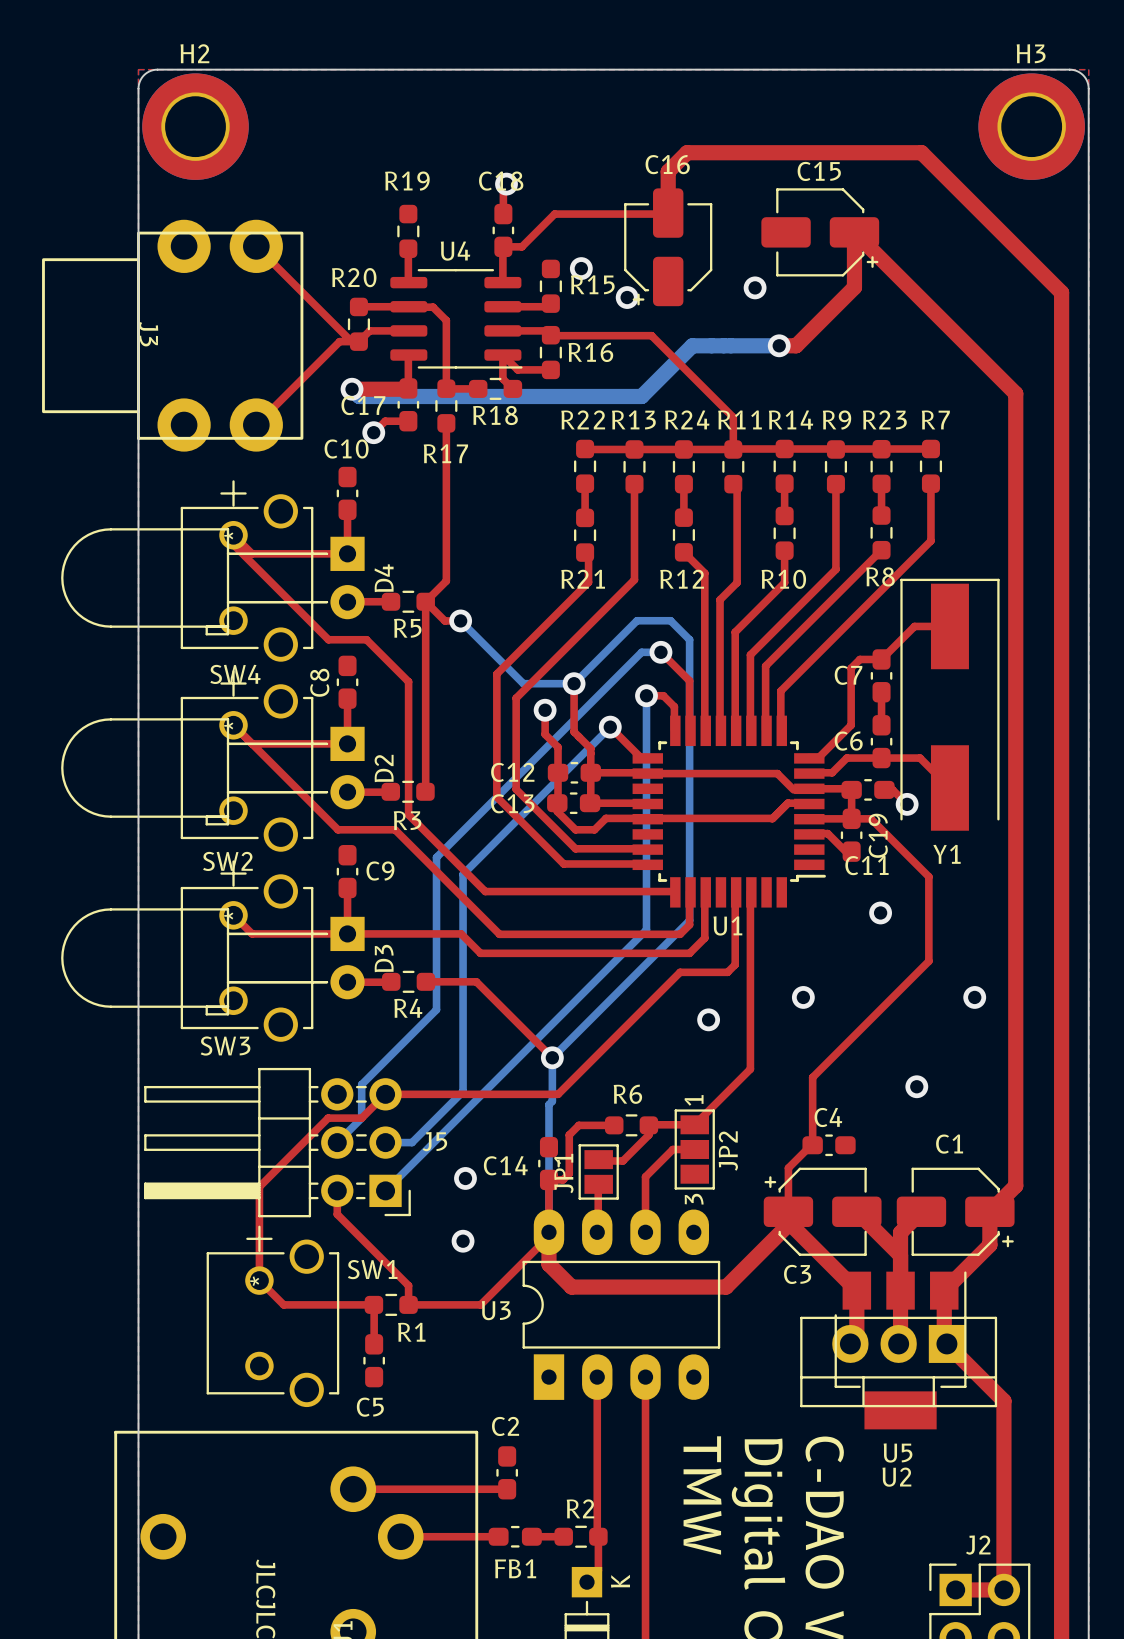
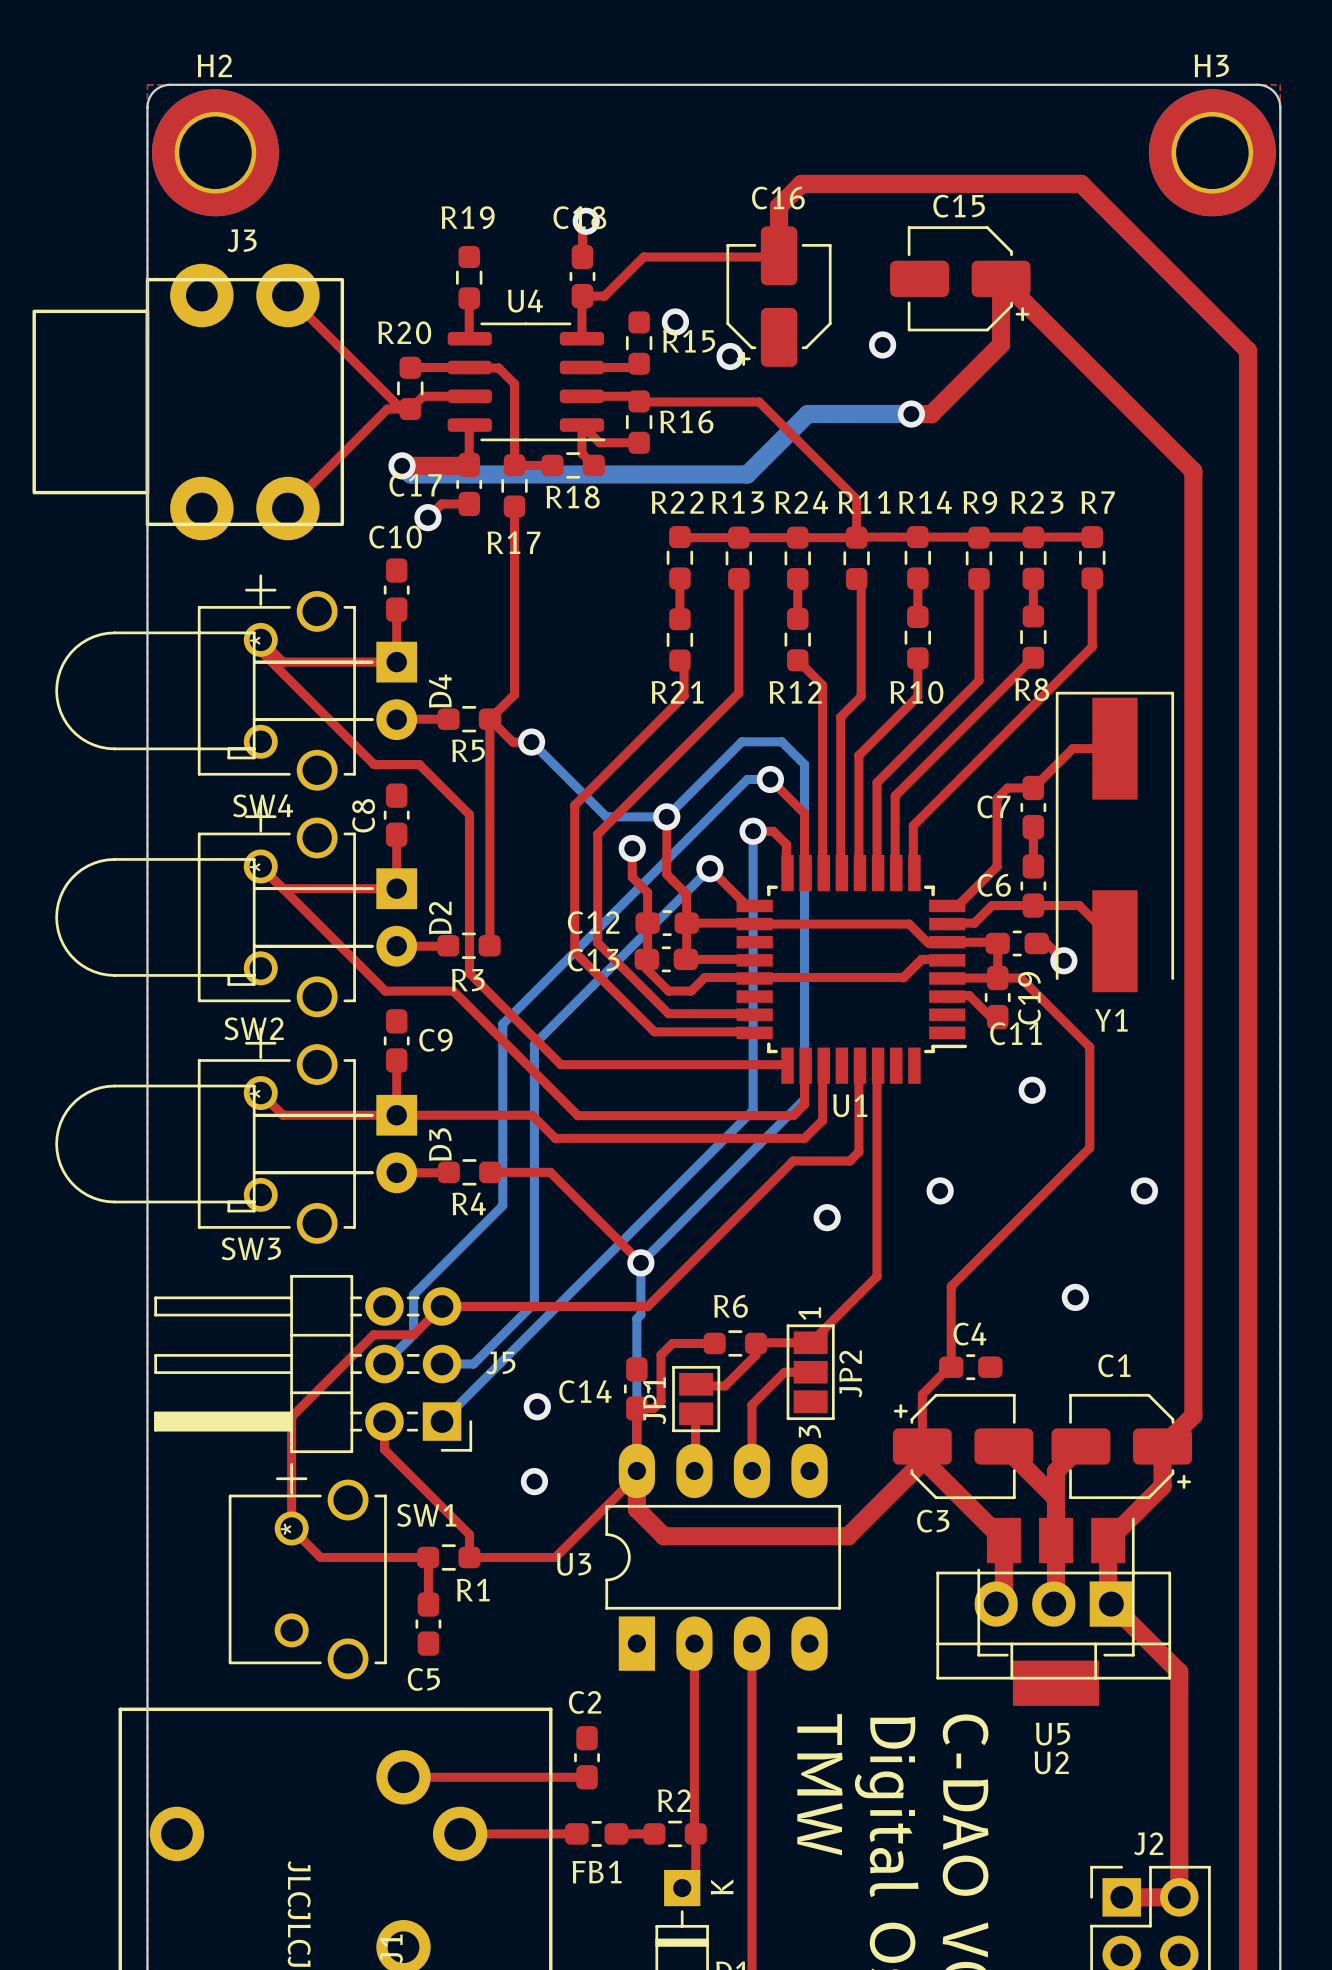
J3 name rotation: 0° (148, 334) -> 90° counterclockwise (242, 240)
J3 name position: J3 (148, 334) -> J3 (242, 240)

